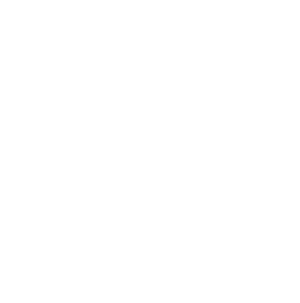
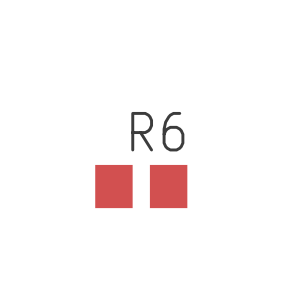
R6: none -> (141, 186)

